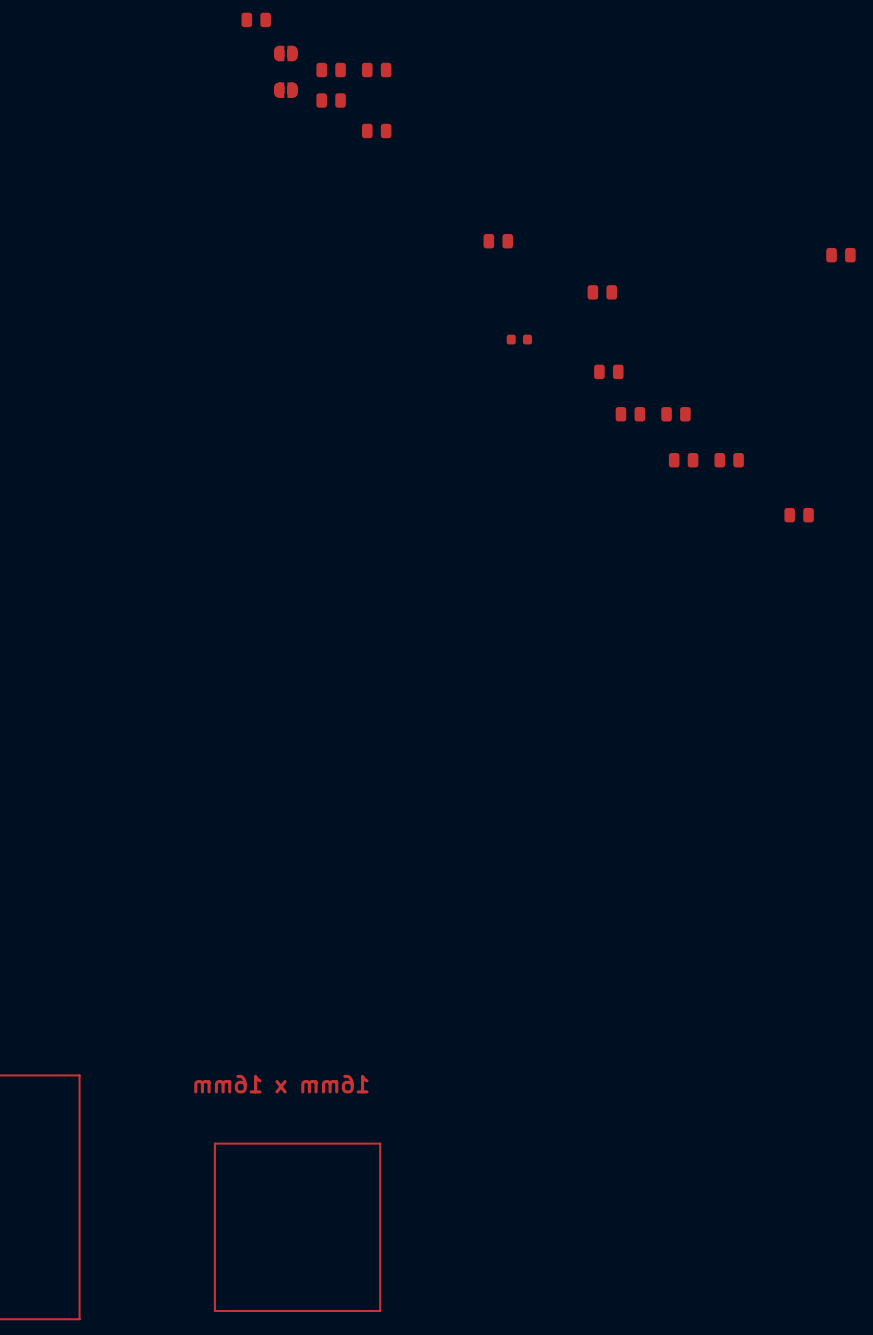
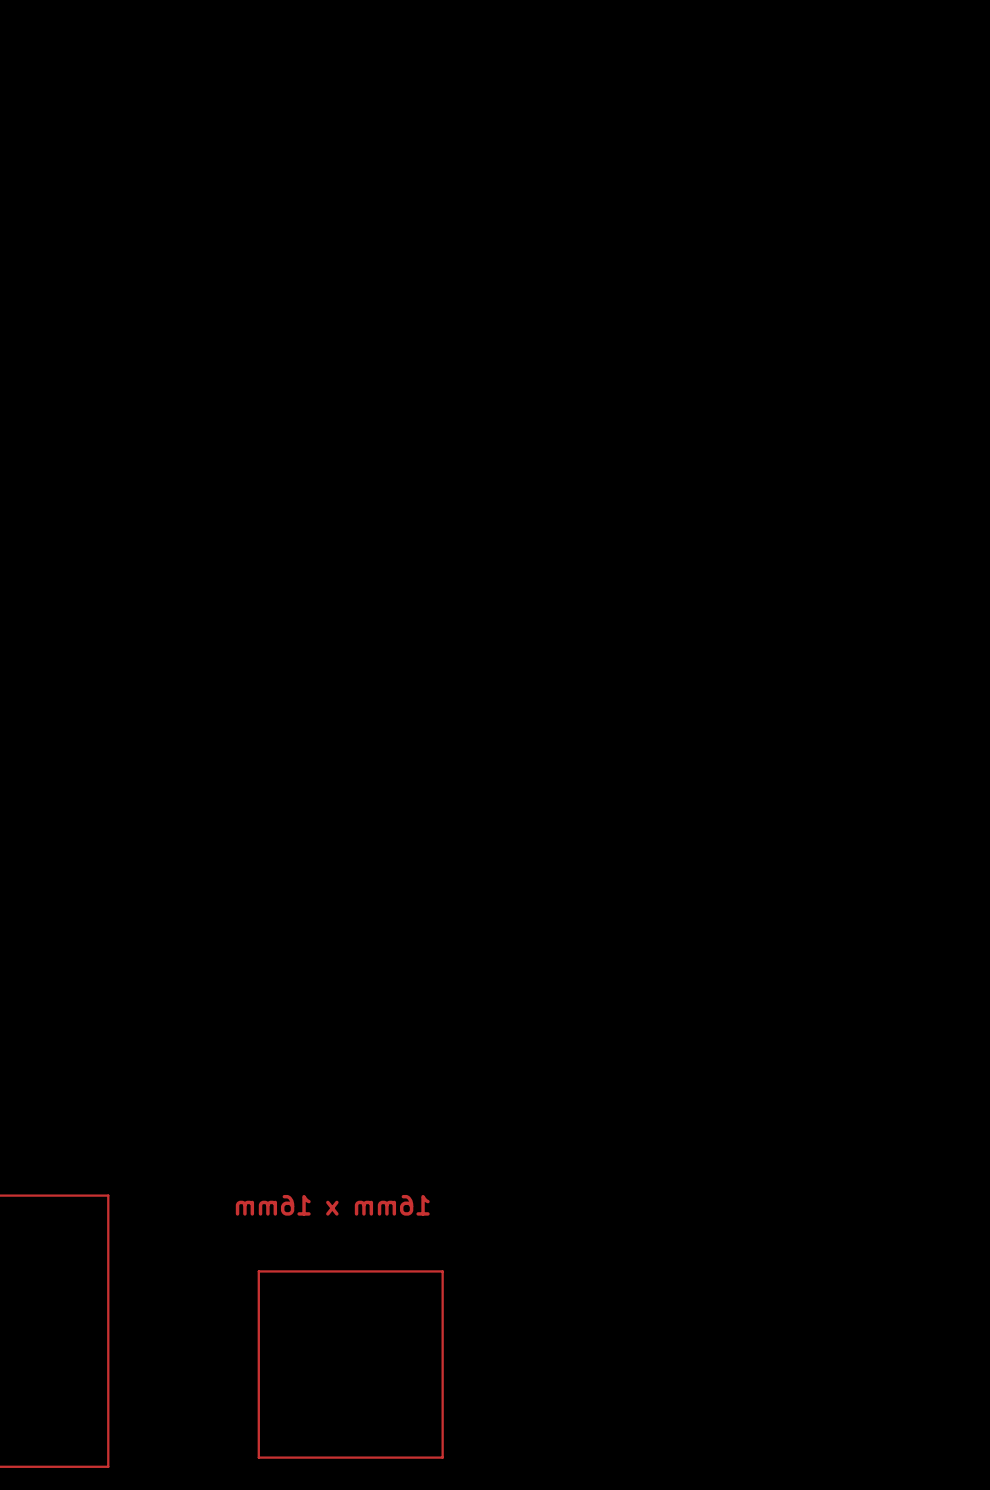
part: (256, 19) -> none
part: (285, 53) -> none
part: (331, 70) -> none
part: (376, 70) -> none
part: (285, 90) -> none
part: (331, 100) -> none
part: (376, 130) -> none
part: (498, 241) -> none
part: (840, 255) -> none
part: (602, 292) -> none
part: (519, 339) -> none
part: (608, 371) -> none
part: (630, 414) -> none
part: (675, 414) -> none
part: (683, 460) -> none
part: (729, 460) -> none
part: (799, 515) -> none

